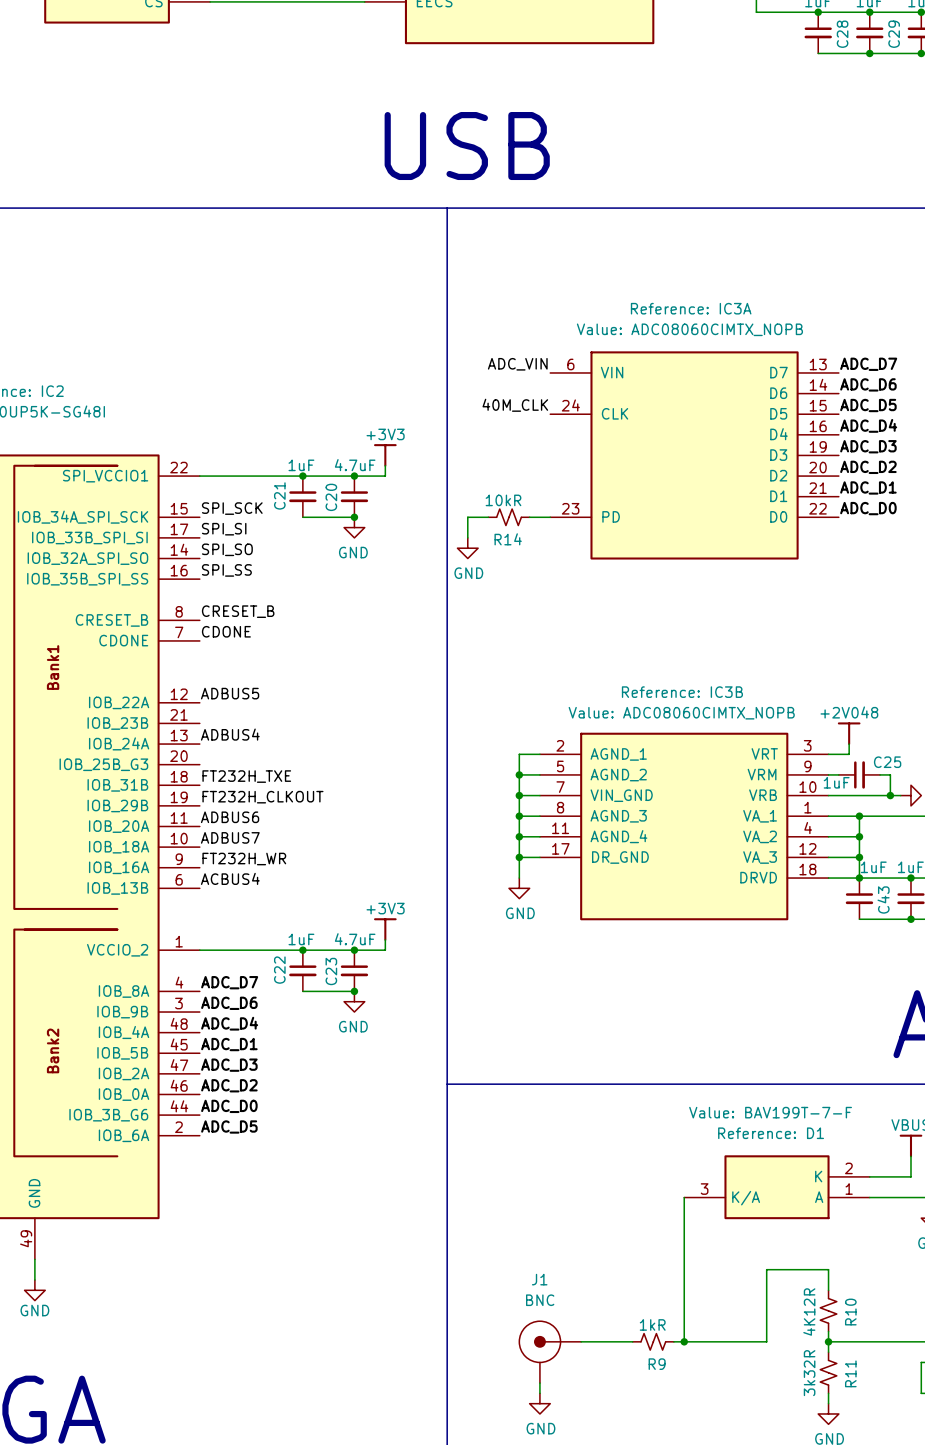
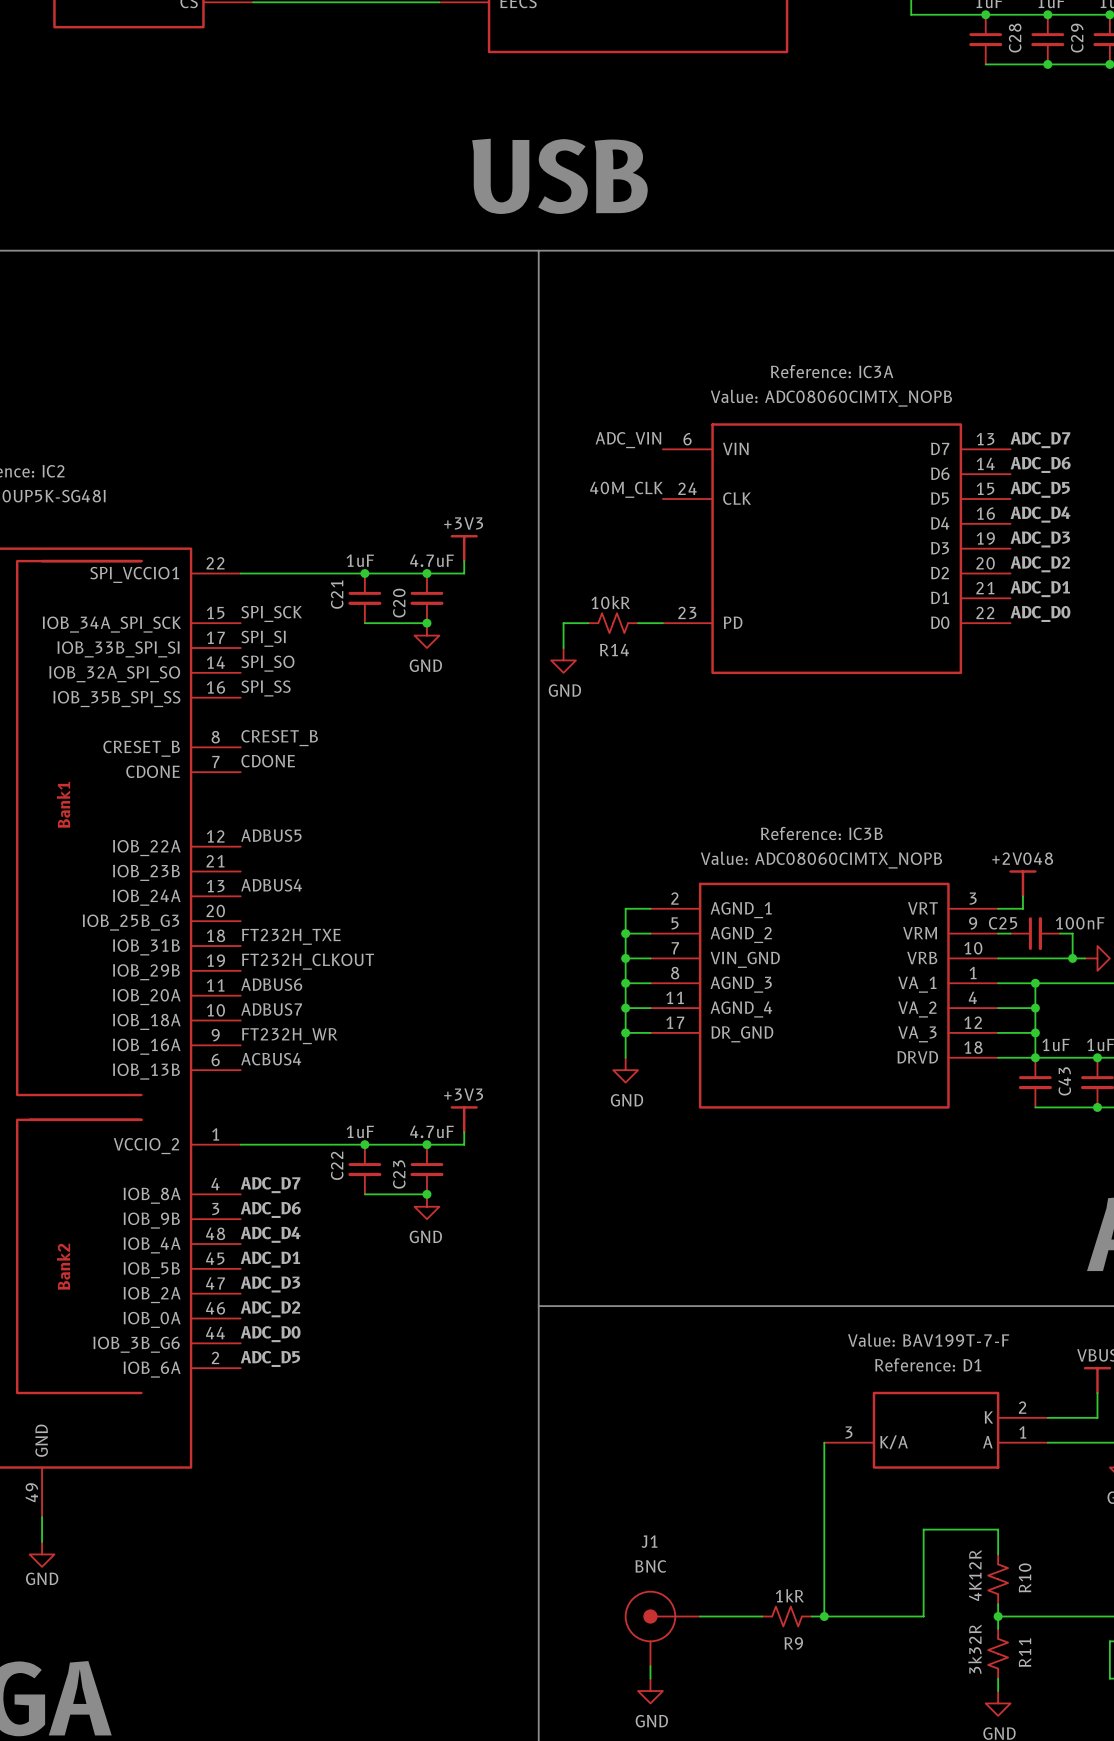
C25 name position: C25 (887, 762) -> C25 (1003, 923)
C25 value: 1uF (836, 782) -> 100nF (1080, 923)

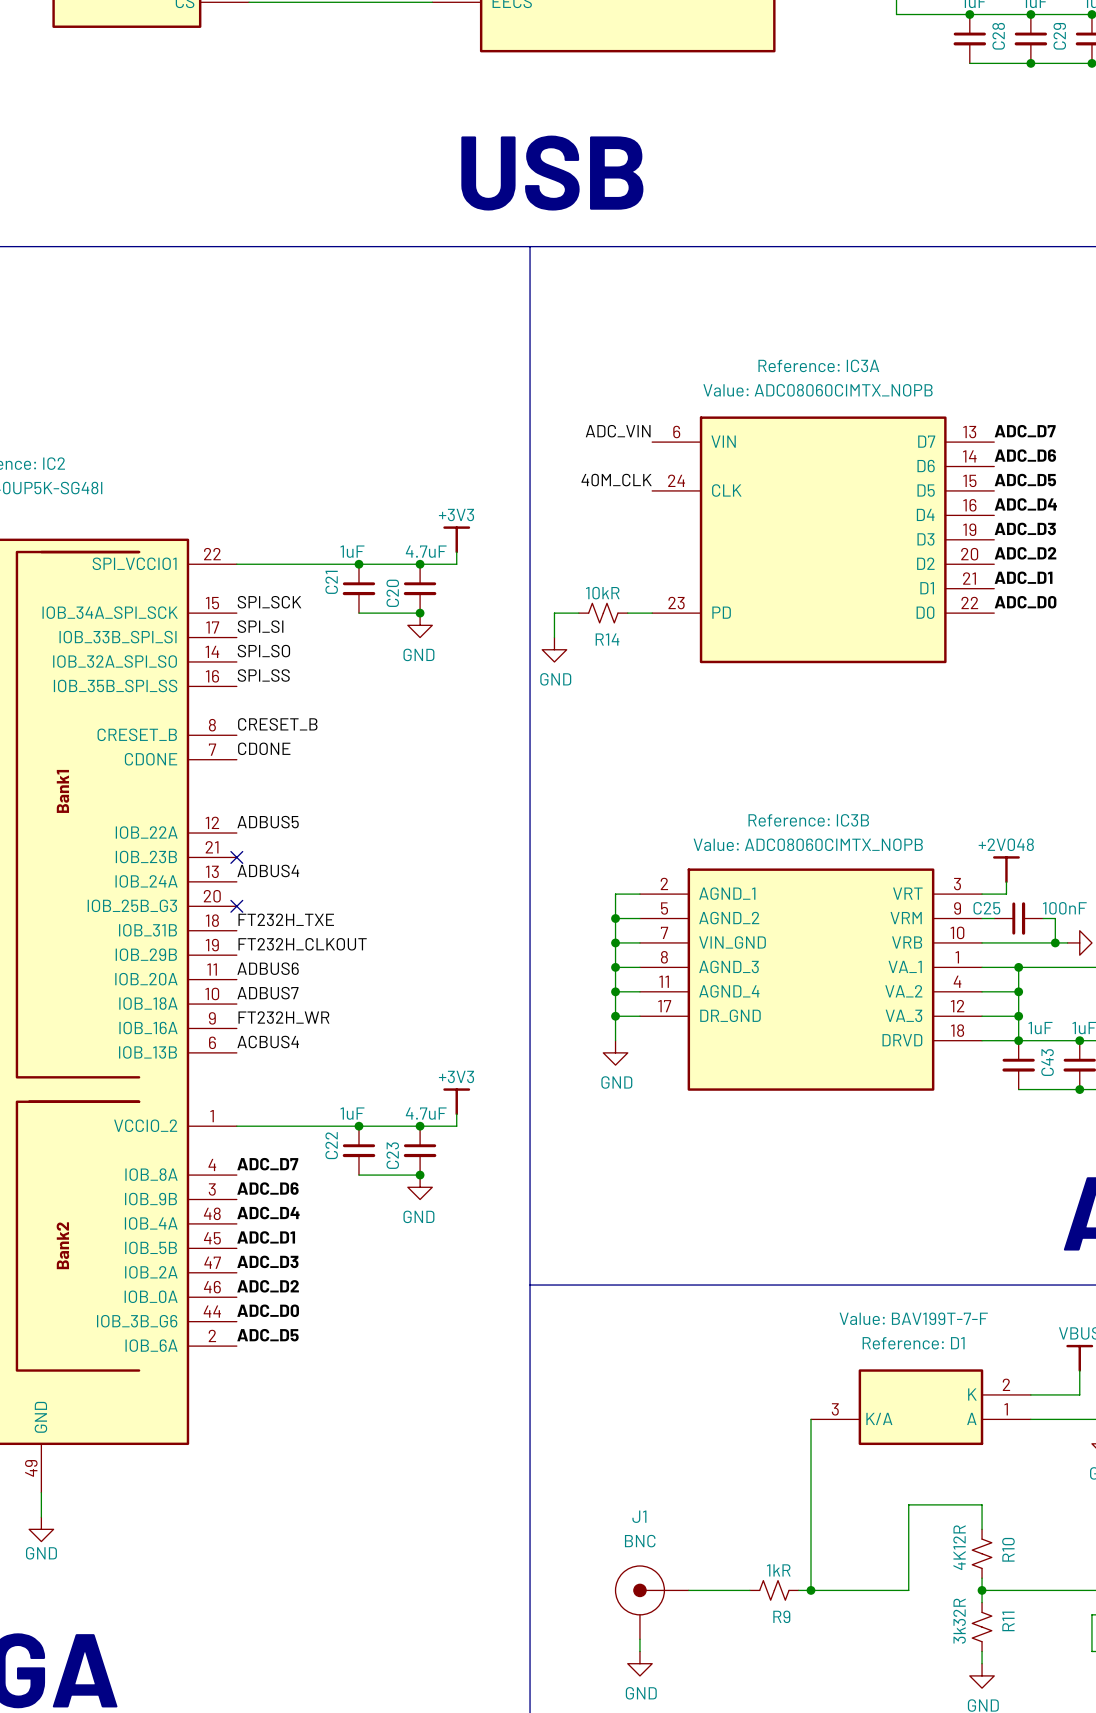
no-connect mark: none -> (236, 857)
no-connect mark: none -> (236, 906)

